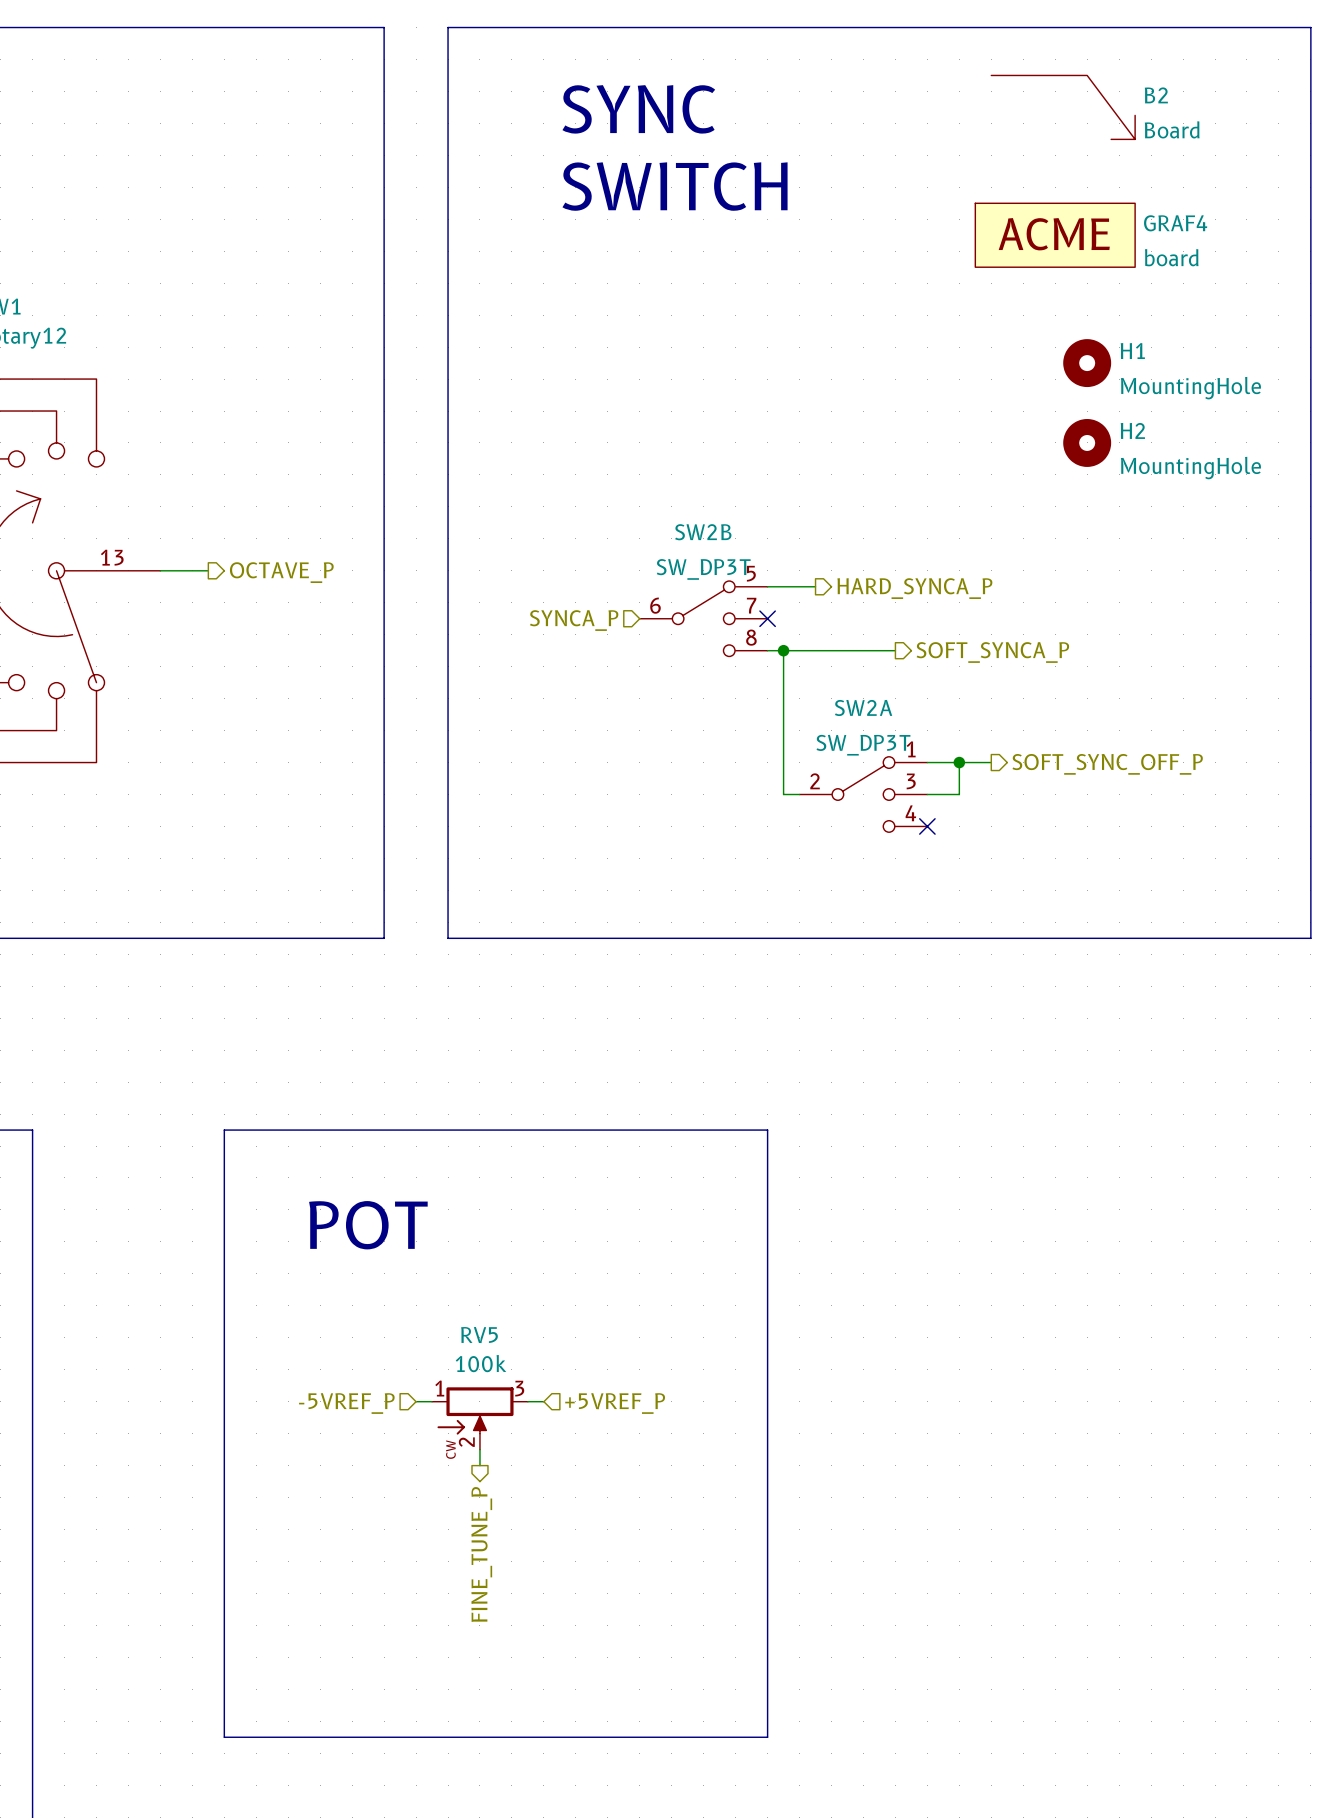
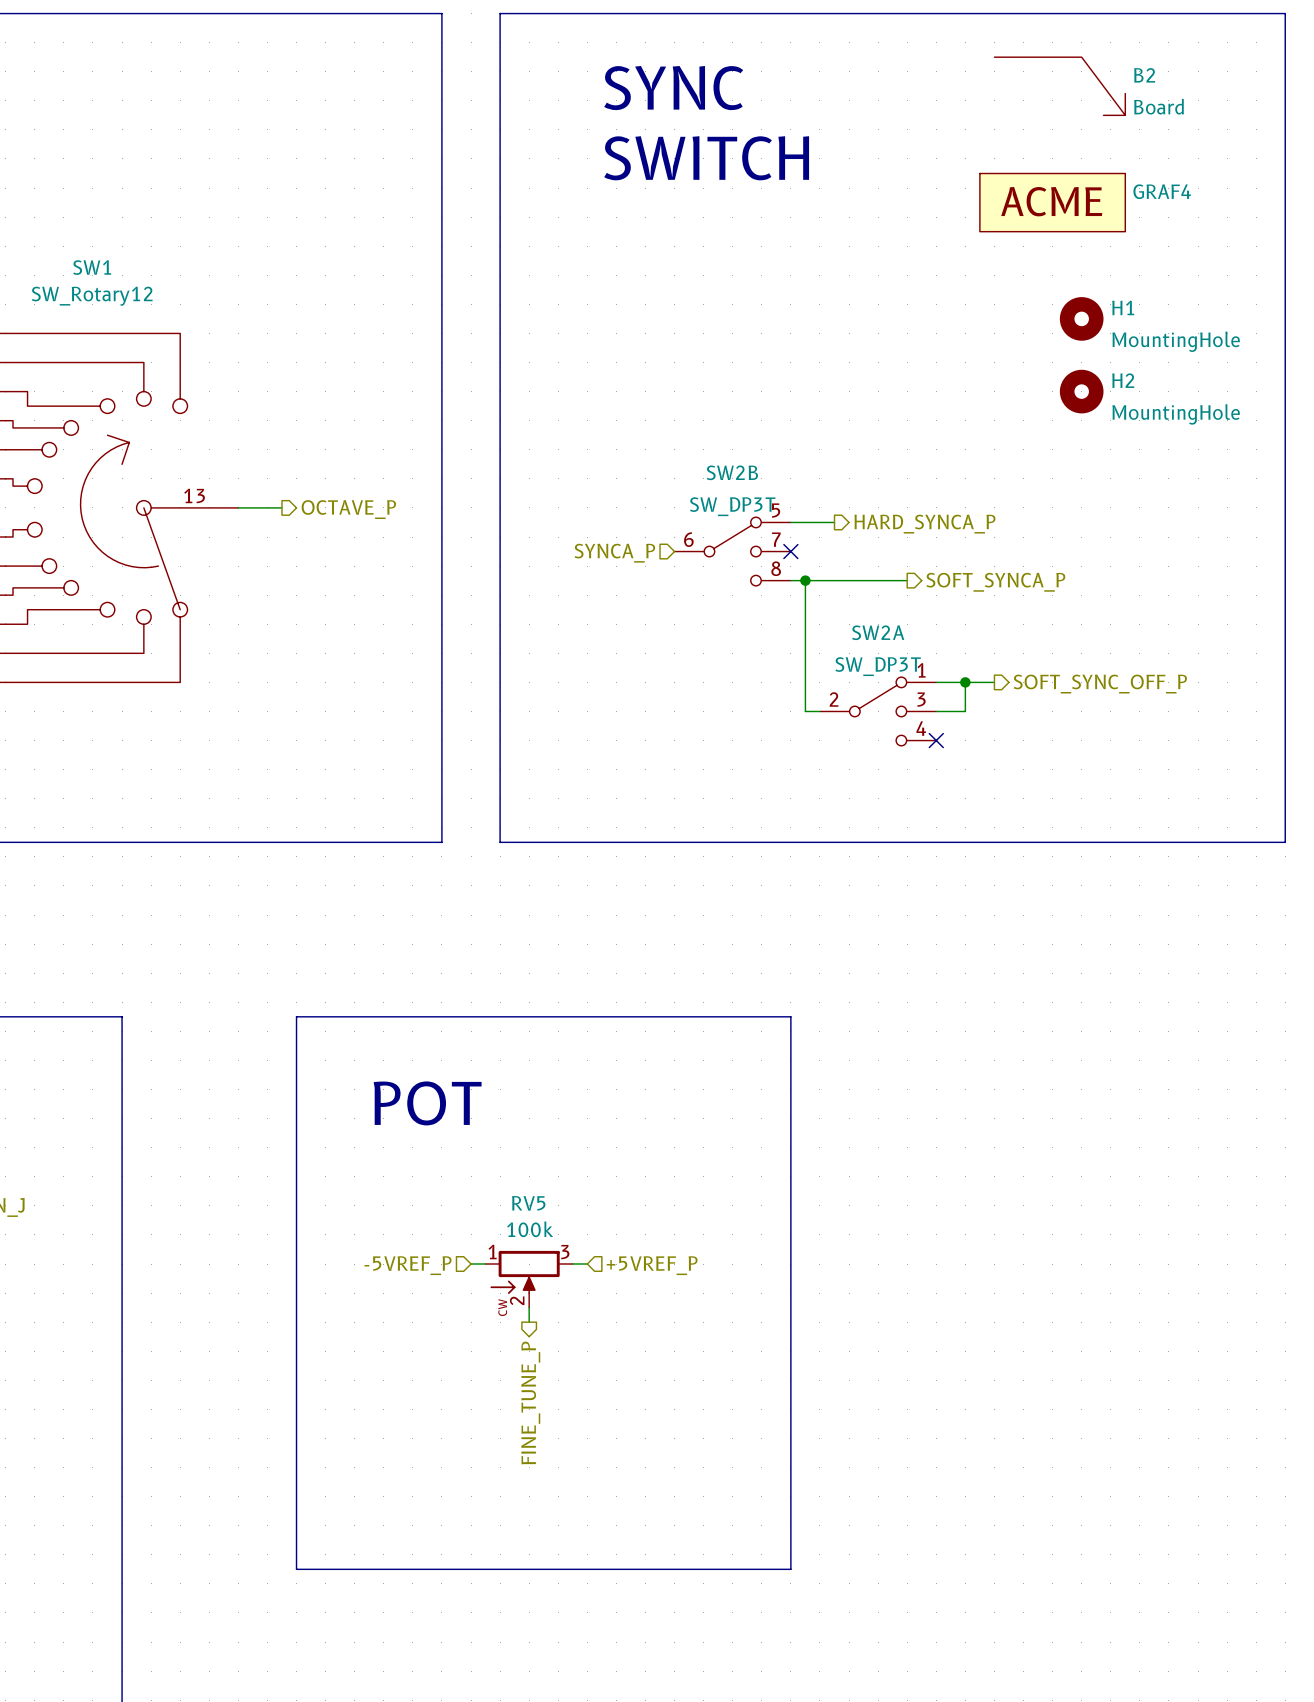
GRAF4 value: board (1171, 257) -> none

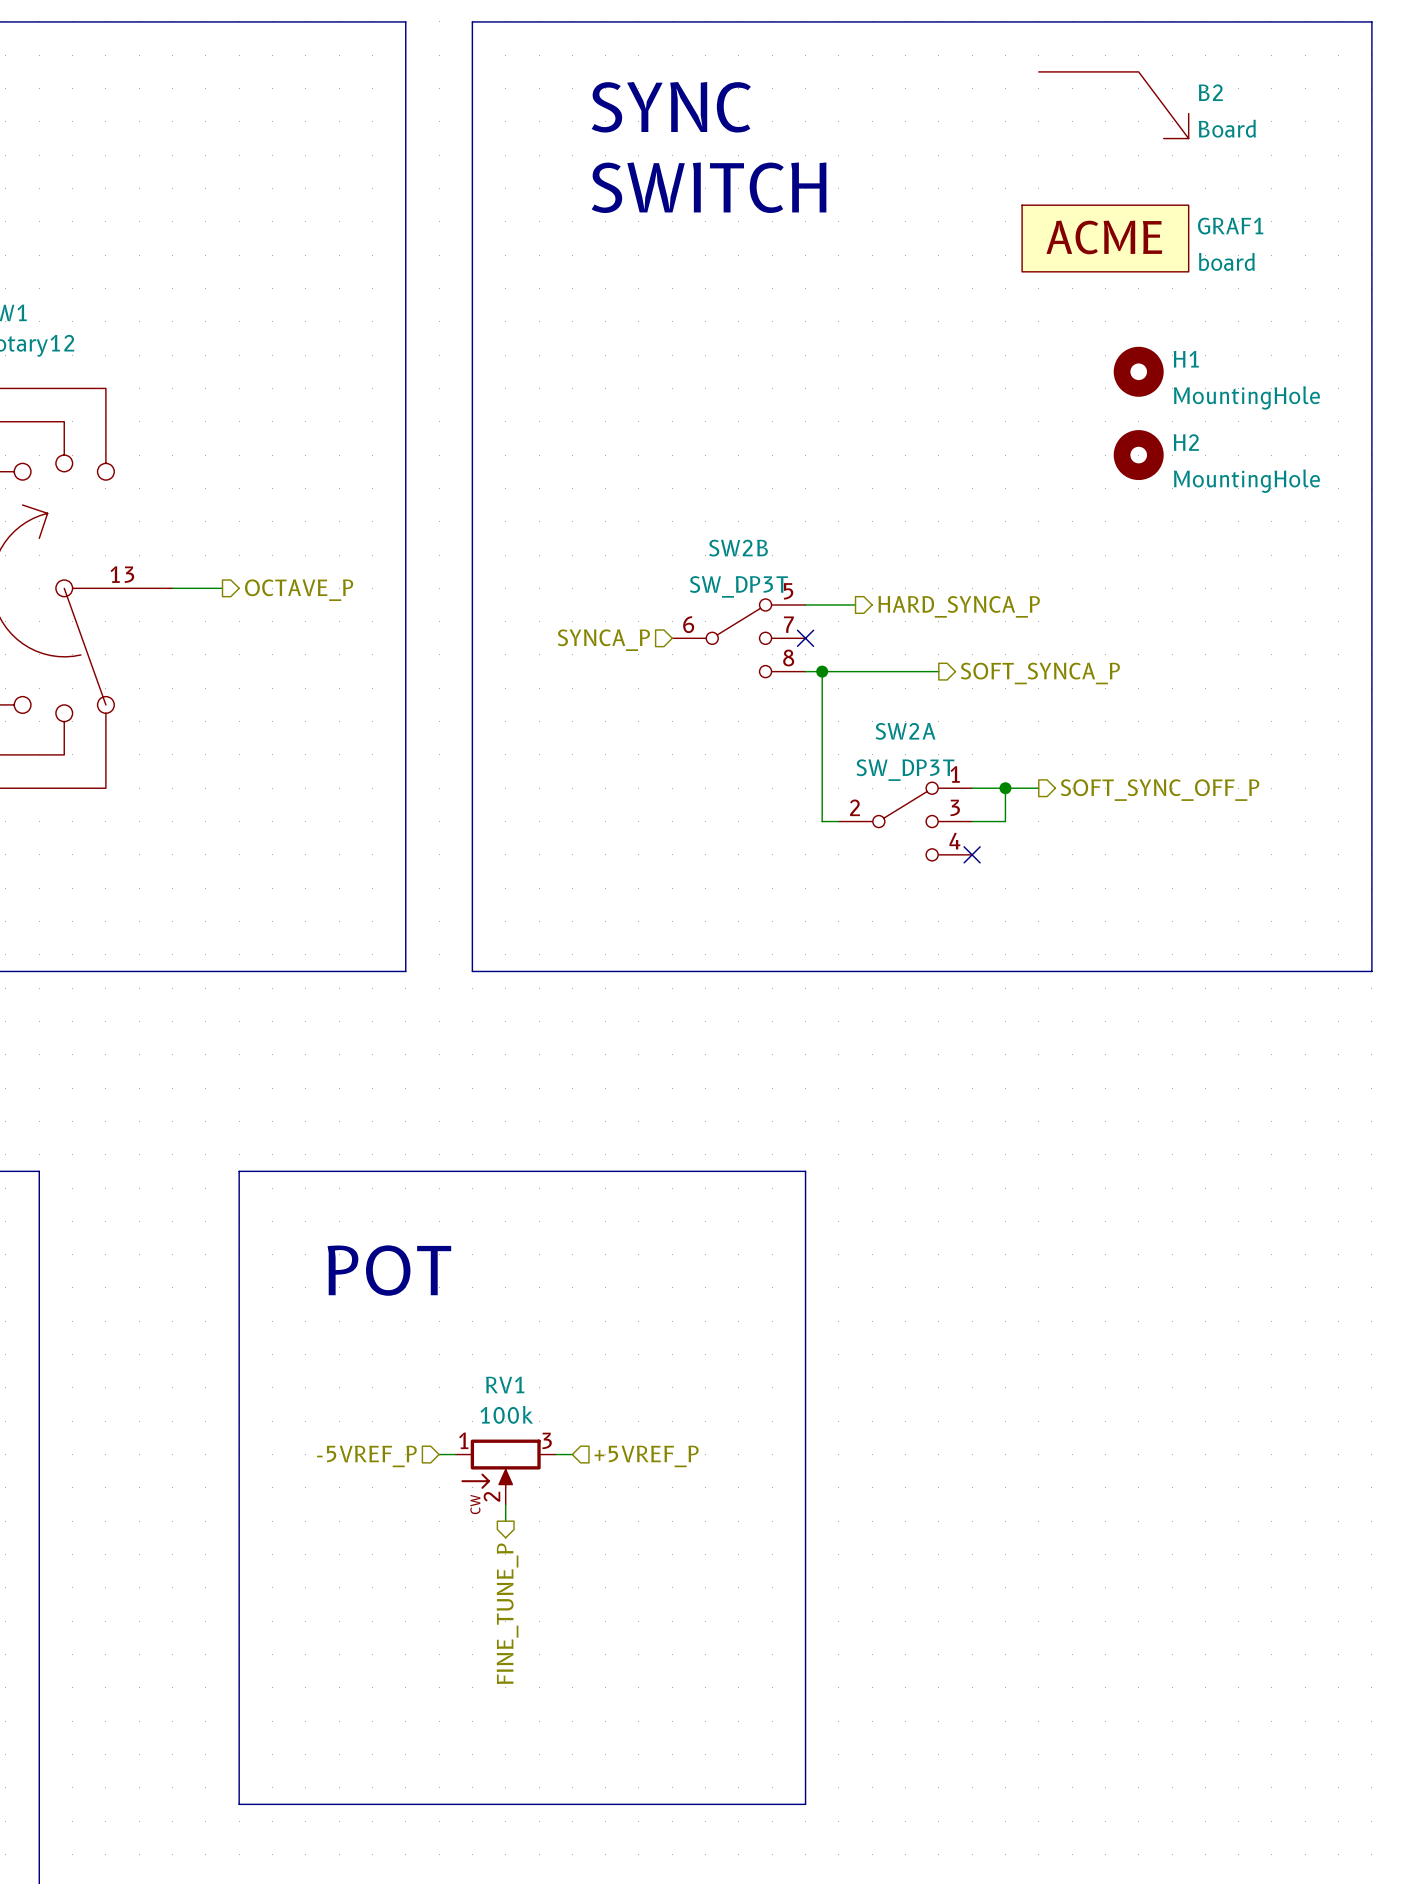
GRAF4 name: GRAF4 (1162, 191) -> GRAF1 (1230, 226)
GRAF4 value: none -> board (1226, 261)
RV5 name: RV5 (528, 1203) -> RV1 (505, 1385)

